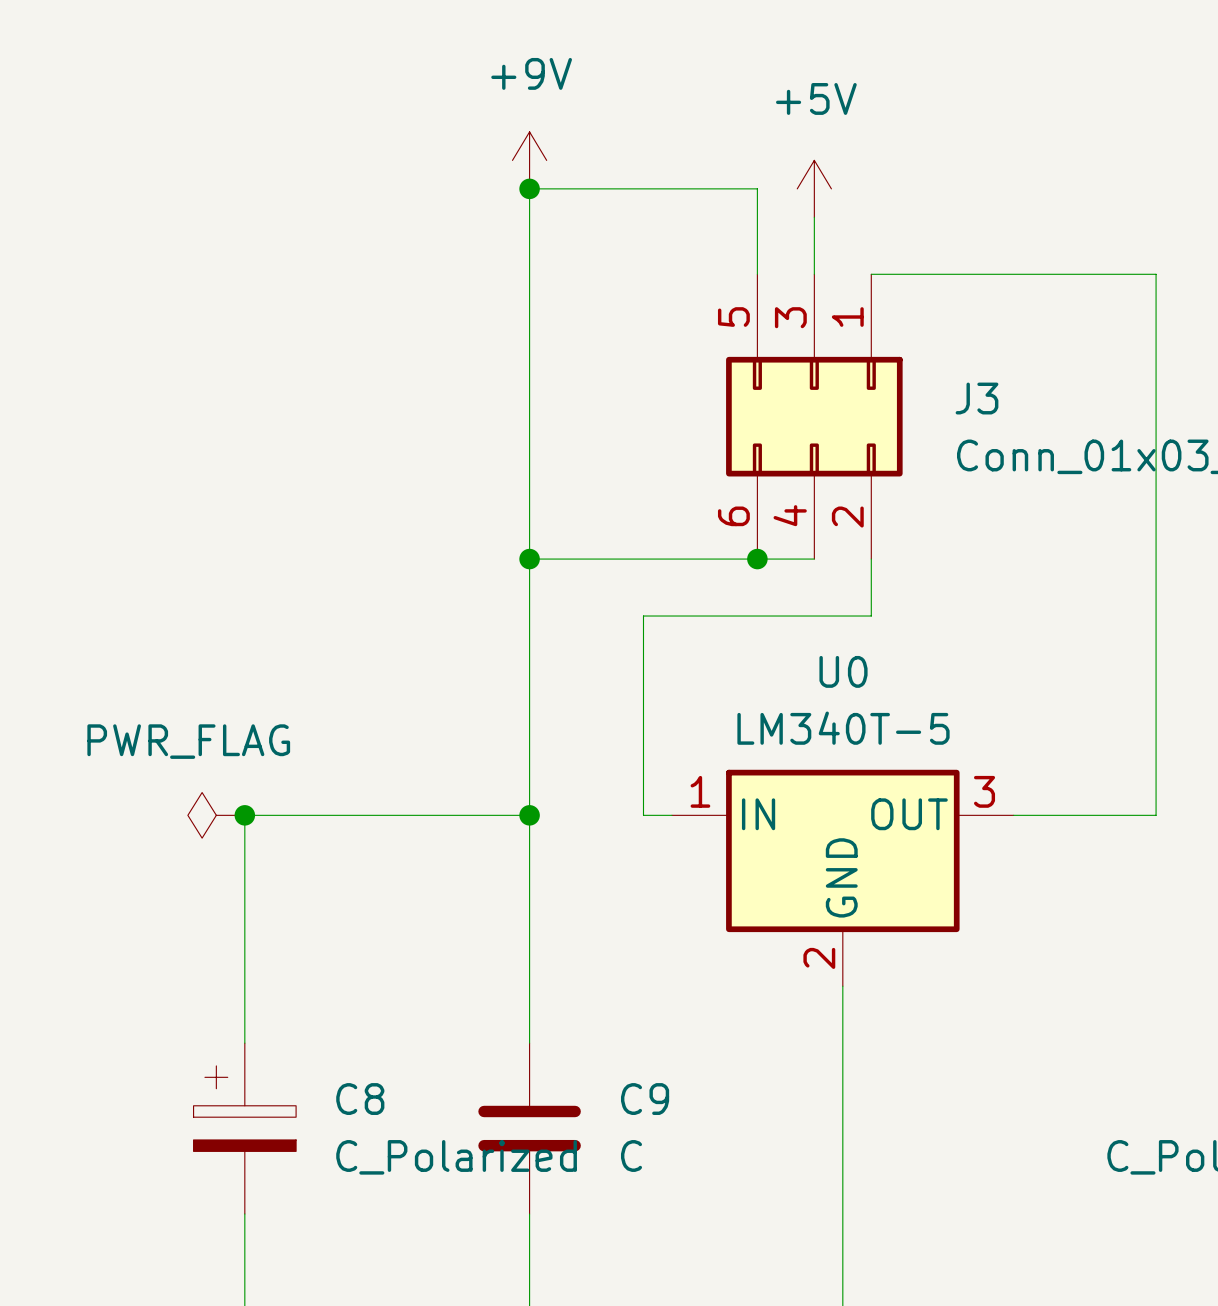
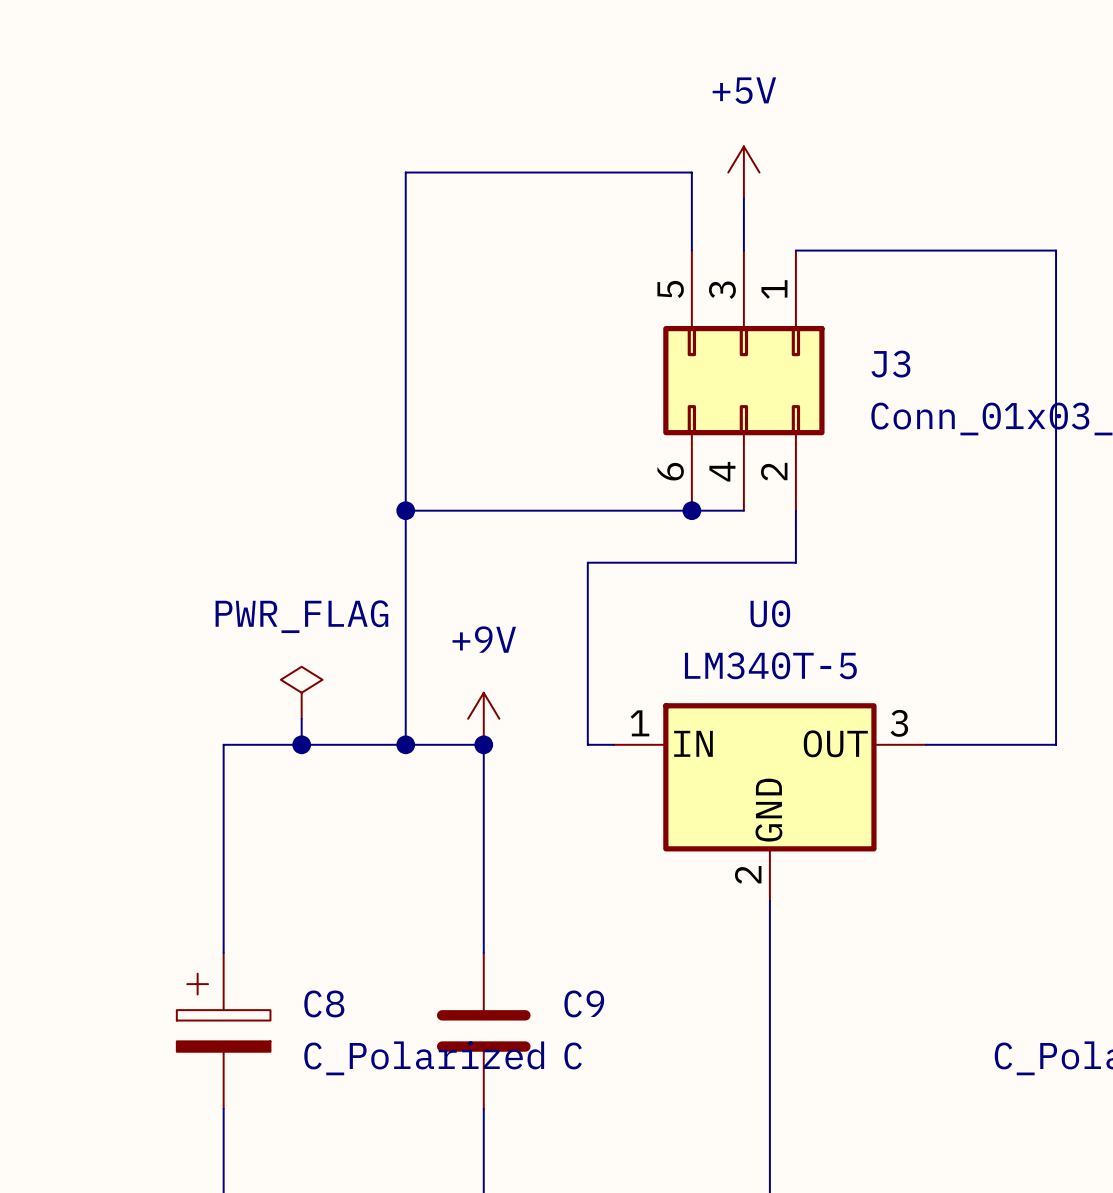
power symbol: +9V (529, 160) -> none
wire: (529, 188) (529, 815) -> (483, 172) (405, 172) (405, 744)
junction: (529, 188) -> none
wire: none -> (405, 510) (483, 510)
junction position: (529, 559) -> (405, 510)
power symbol text position: PWR_FLAG (188, 741) -> PWR_FLAG (301, 616)
wire: none -> (301, 718) (301, 744)
power symbol: none -> +9V (483, 718)
power symbol rotation: 0° (216, 815) -> 90° clockwise (301, 692)
power symbol position: PWR_FLAG (216, 815) -> PWR_FLAG (301, 692)
junction position: (244, 815) -> (301, 744)
junction: none -> (405, 744)

